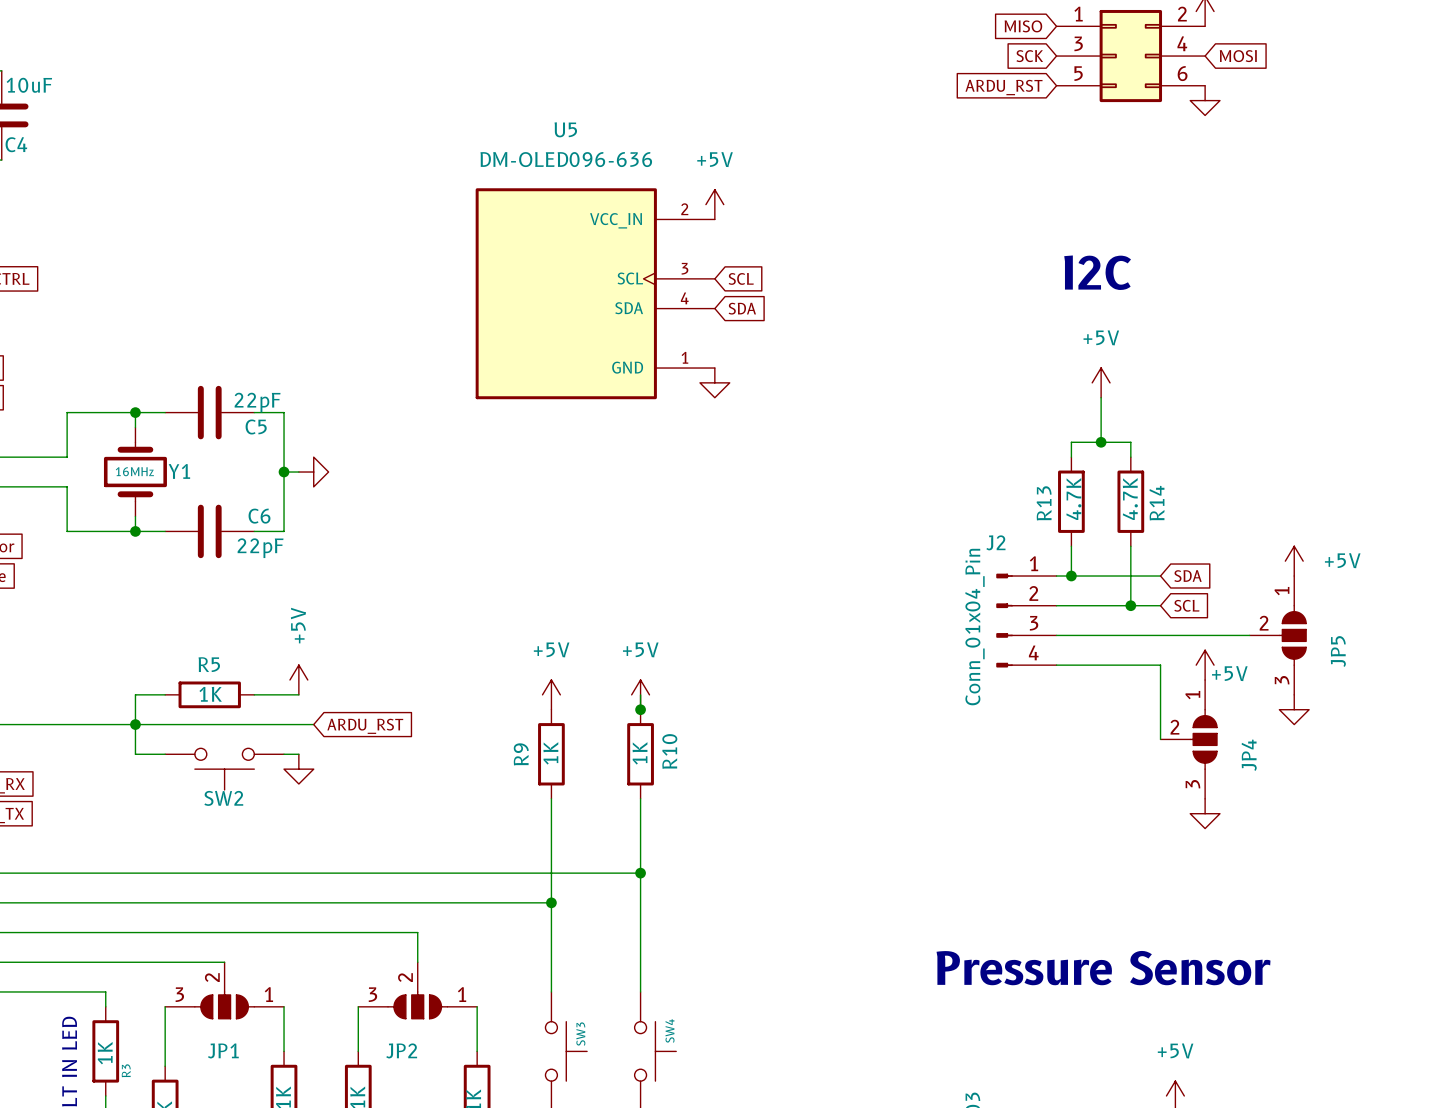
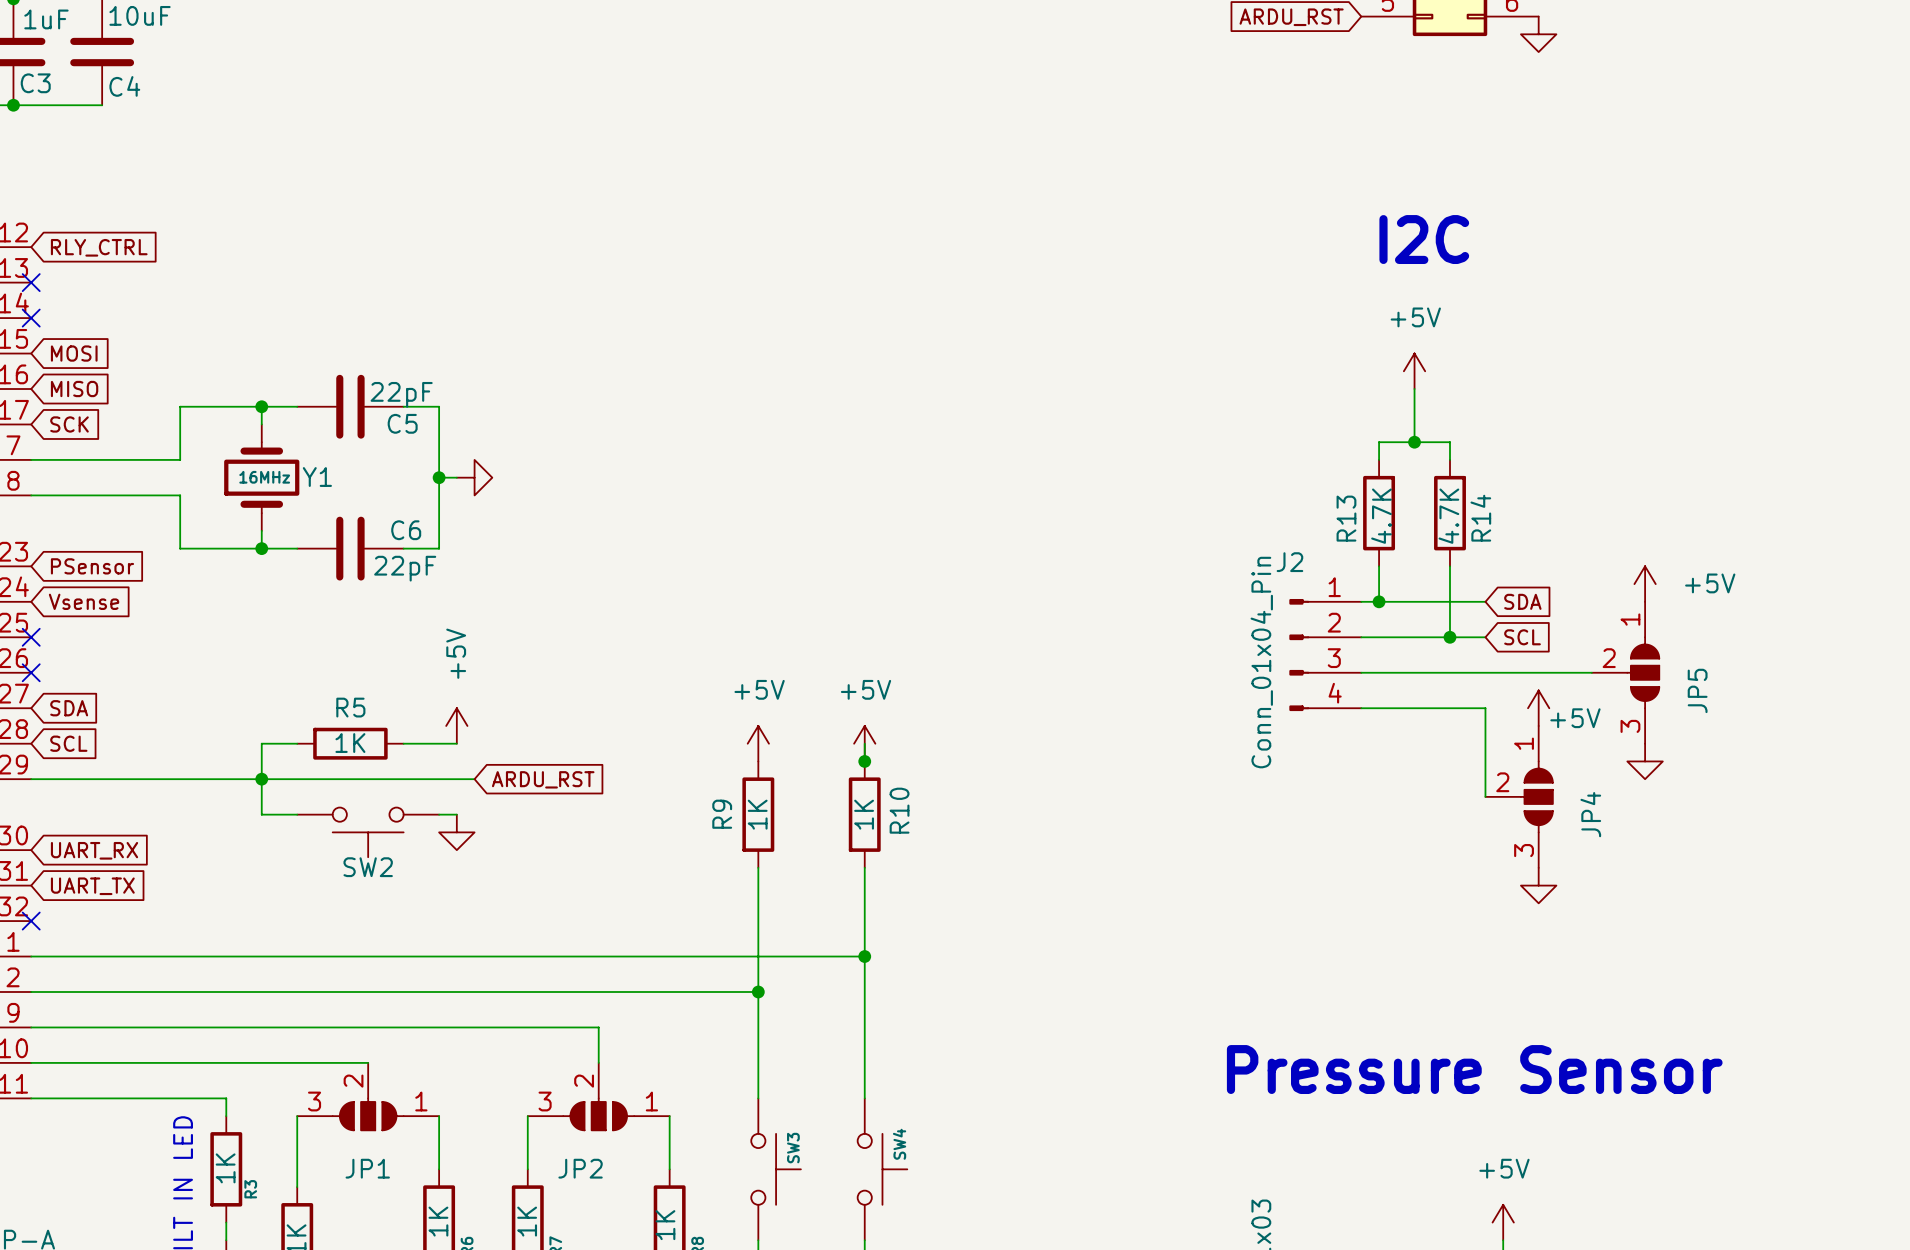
power symbol: +5V (714, 204) -> none
global label: SCL (741, 278) -> none
U5: DM-OLED096-636 (595, 293) -> none
global label: SDA (742, 308) -> none
power symbol: (714, 382) -> none

